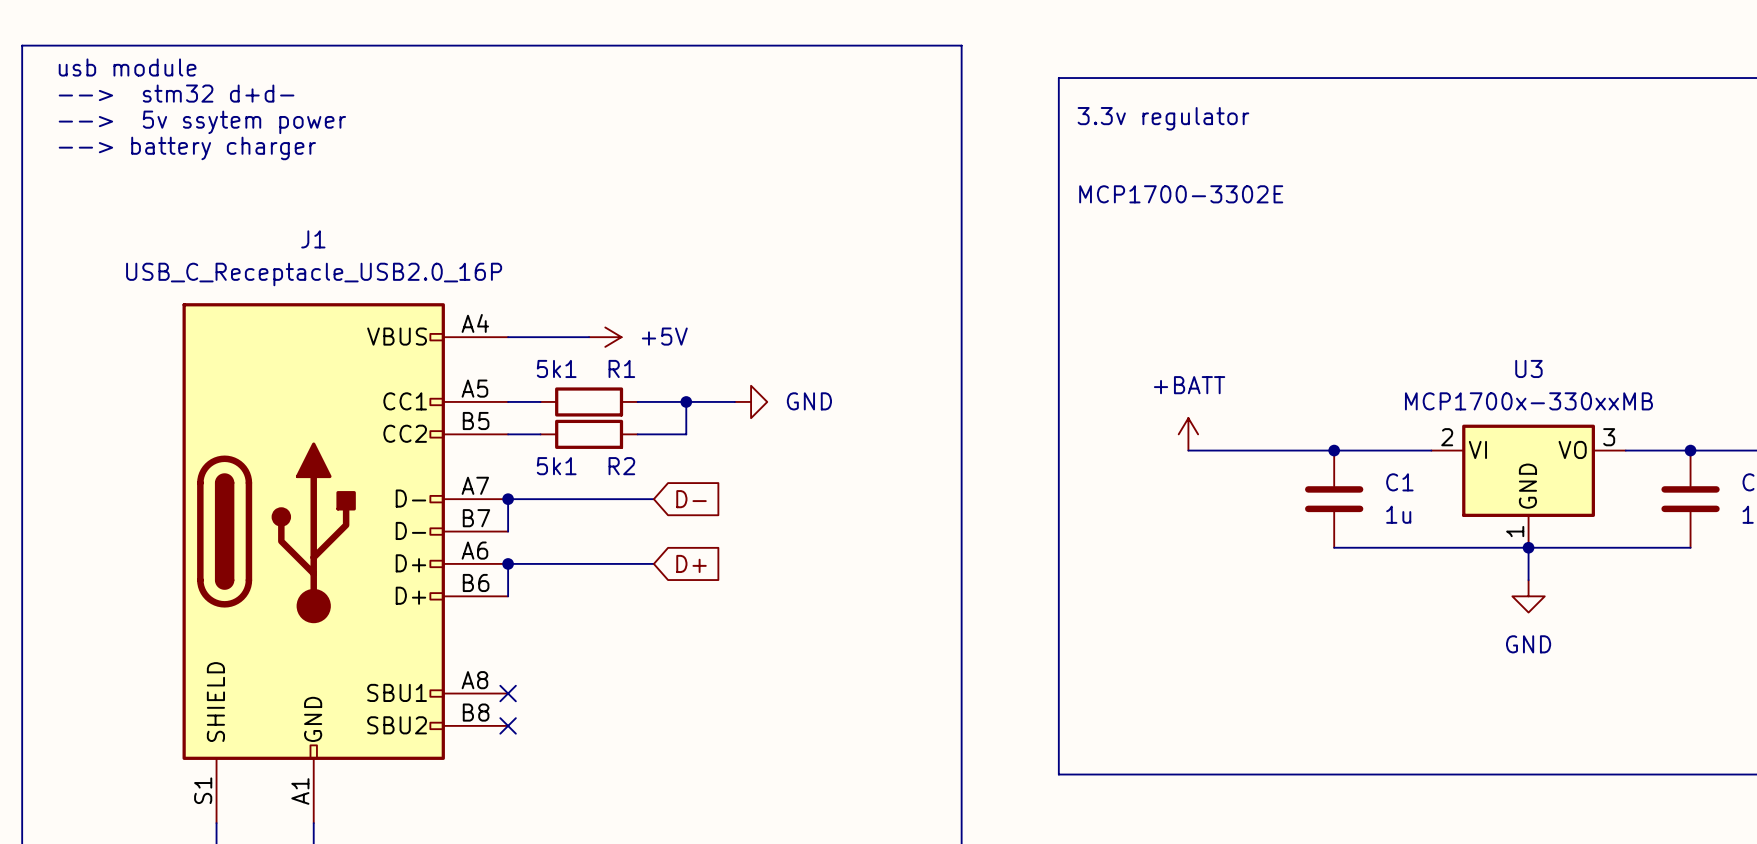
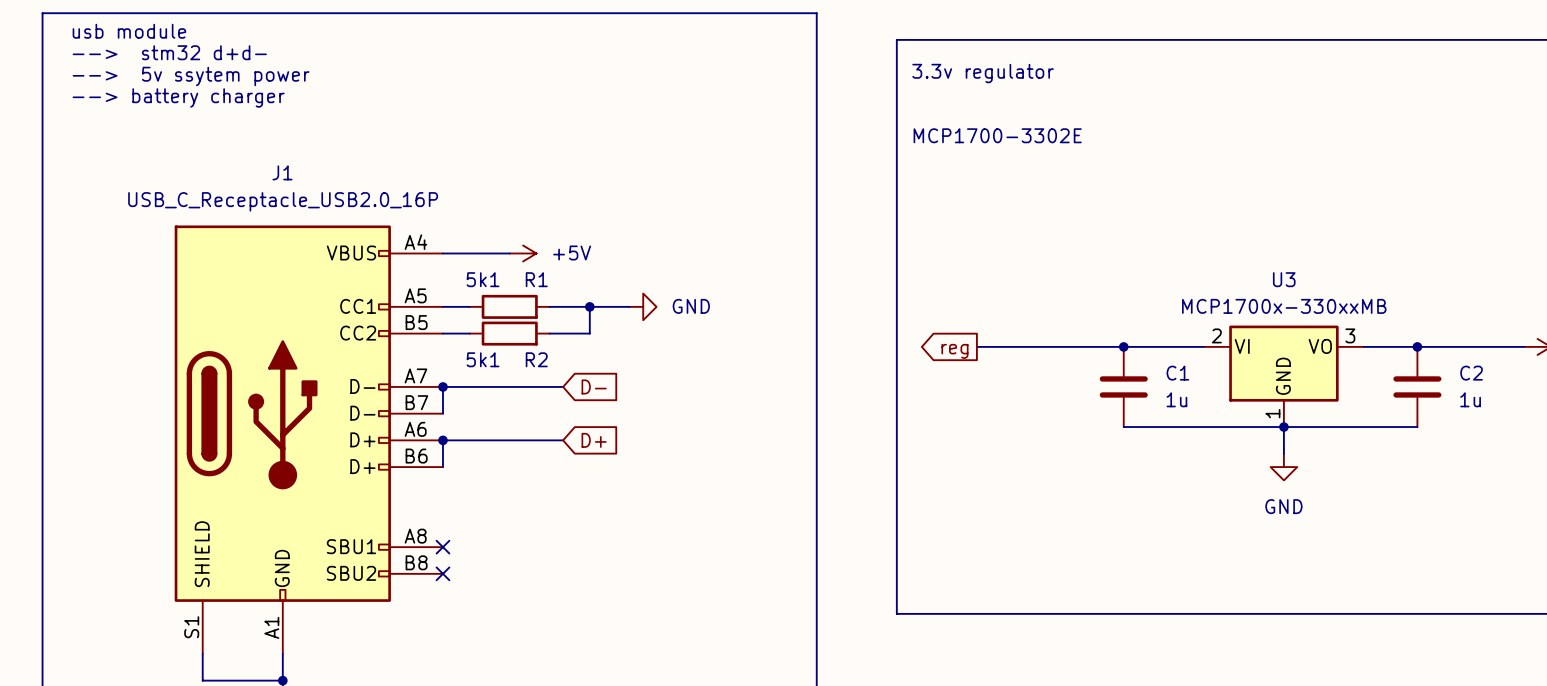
power symbol: +BATT (1188, 434) -> none
wire: none -> (976, 346) (1003, 346)
global label: none -> reg (954, 351)

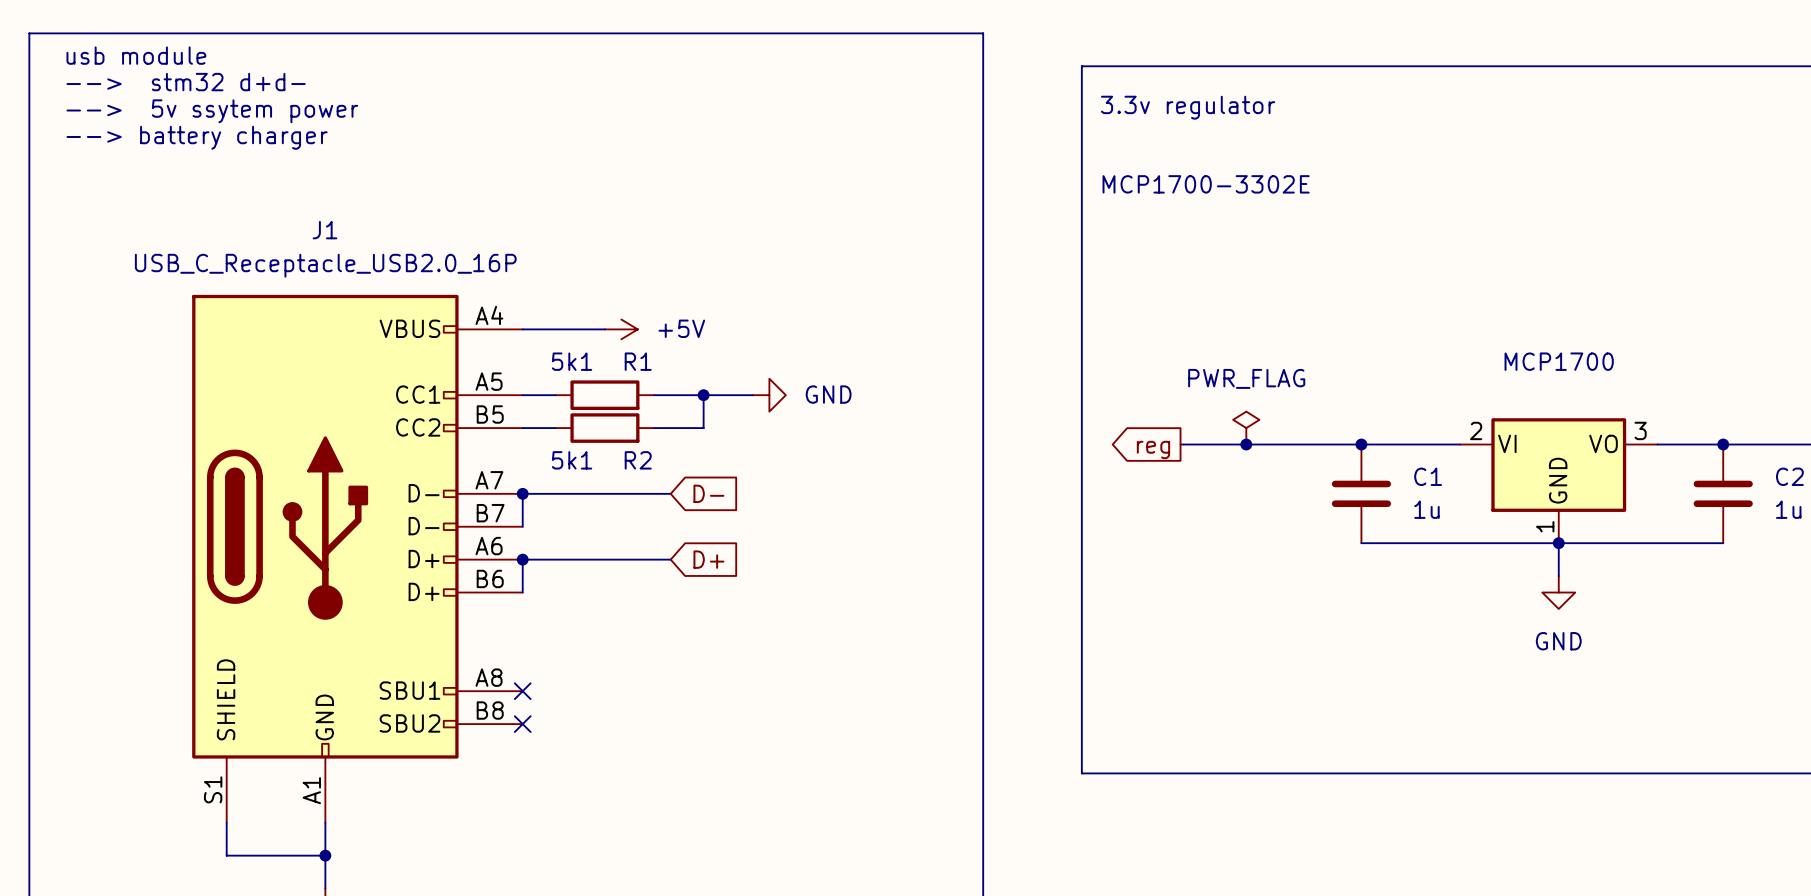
U3 name: U3 (1284, 279) -> MCP1700 (1559, 361)
U3 value: MCP1700x-330xxMB (1284, 306) -> none
power symbol: none -> PWR_FLAG (1246, 428)
junction: none -> (1246, 444)

